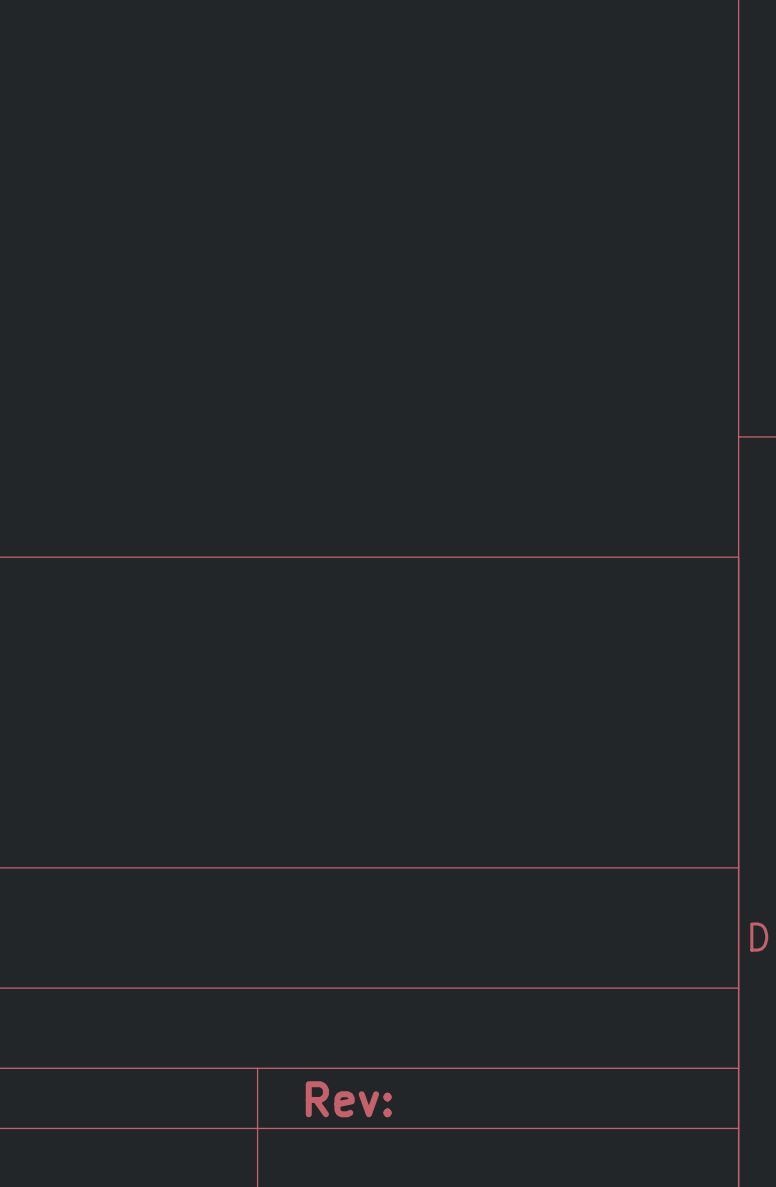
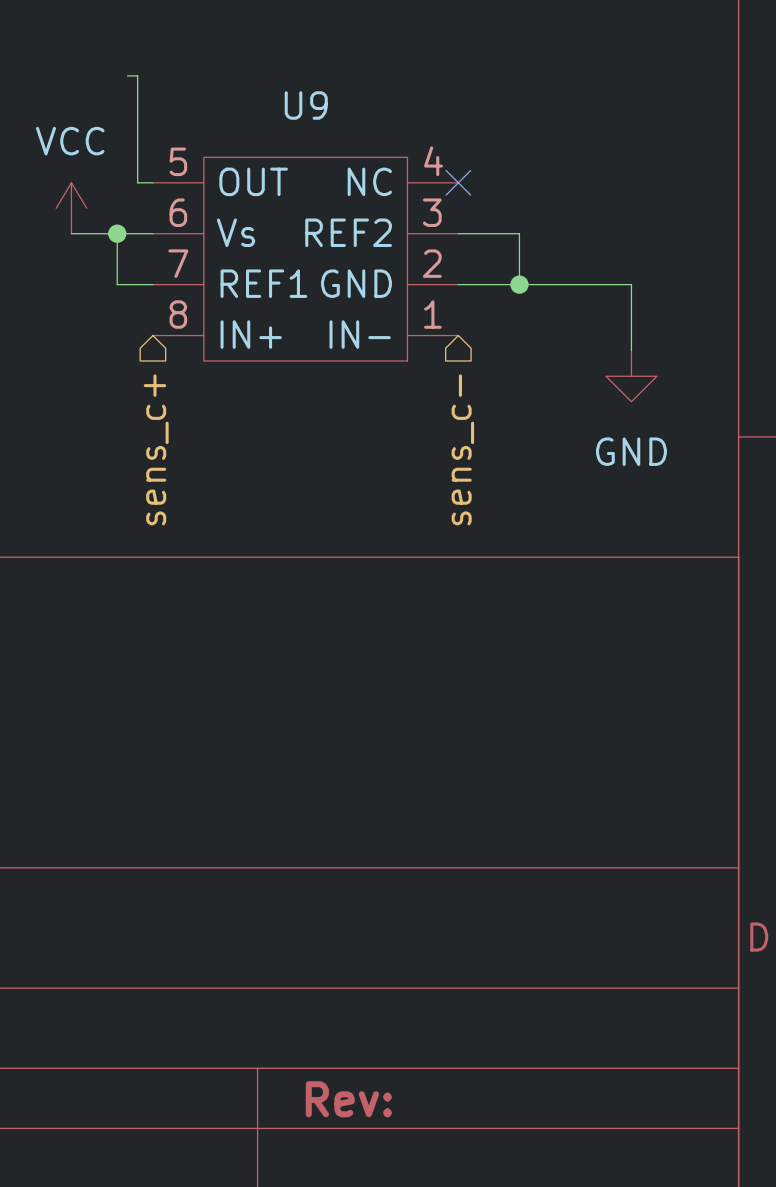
wire: none -> (127, 75) (137, 75) (137, 182) (152, 182)
no-connect mark: none -> (458, 182)
power symbol: none -> VCC (71, 208)
wire: none -> (71, 233) (152, 233)
wire: none -> (117, 233) (117, 284) (152, 284)
junction: none -> (117, 233)
wire: none -> (458, 233) (519, 233) (519, 284)
U9: none -> (305, 259)
wire: none -> (458, 284) (631, 284) (631, 350)
junction: none -> (519, 284)
power symbol: none -> GND (631, 376)
hierarchical label: none -> sens_c+ (156, 449)
hierarchical label: none -> sens_c- (462, 449)

